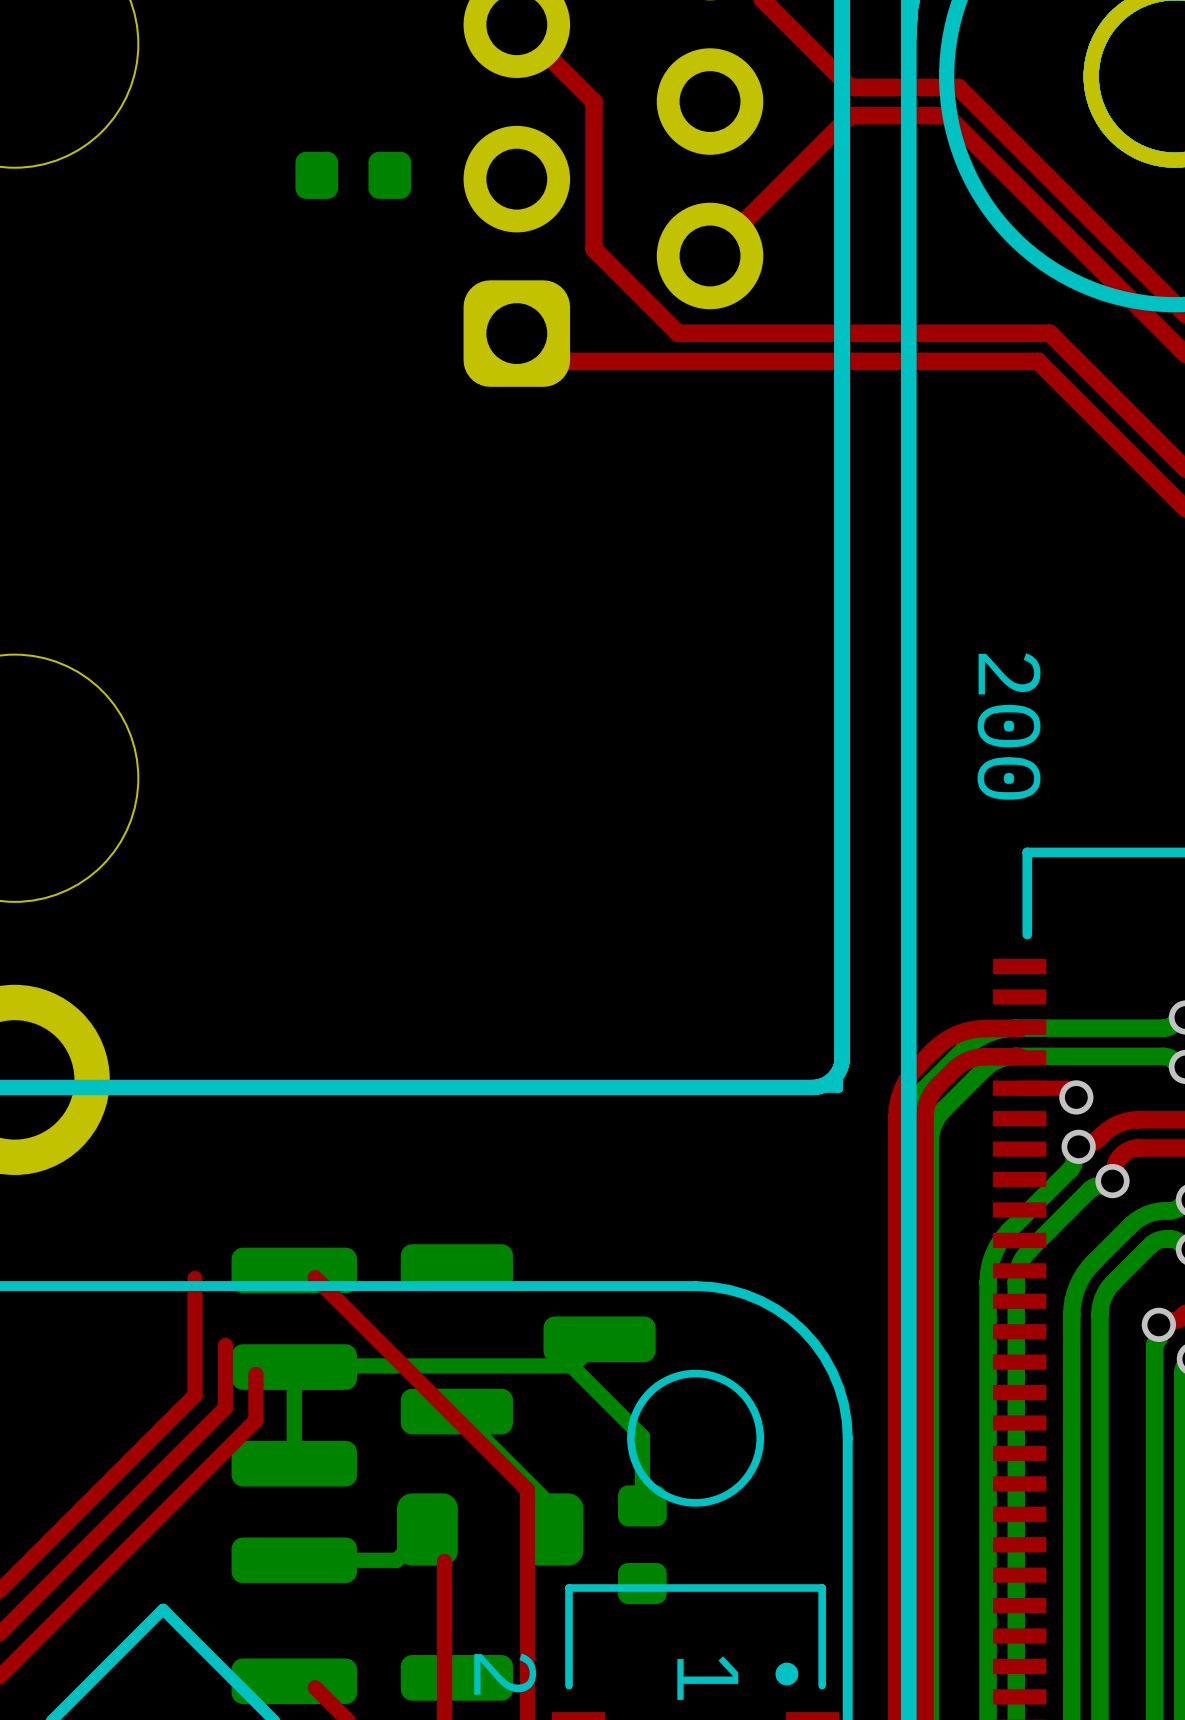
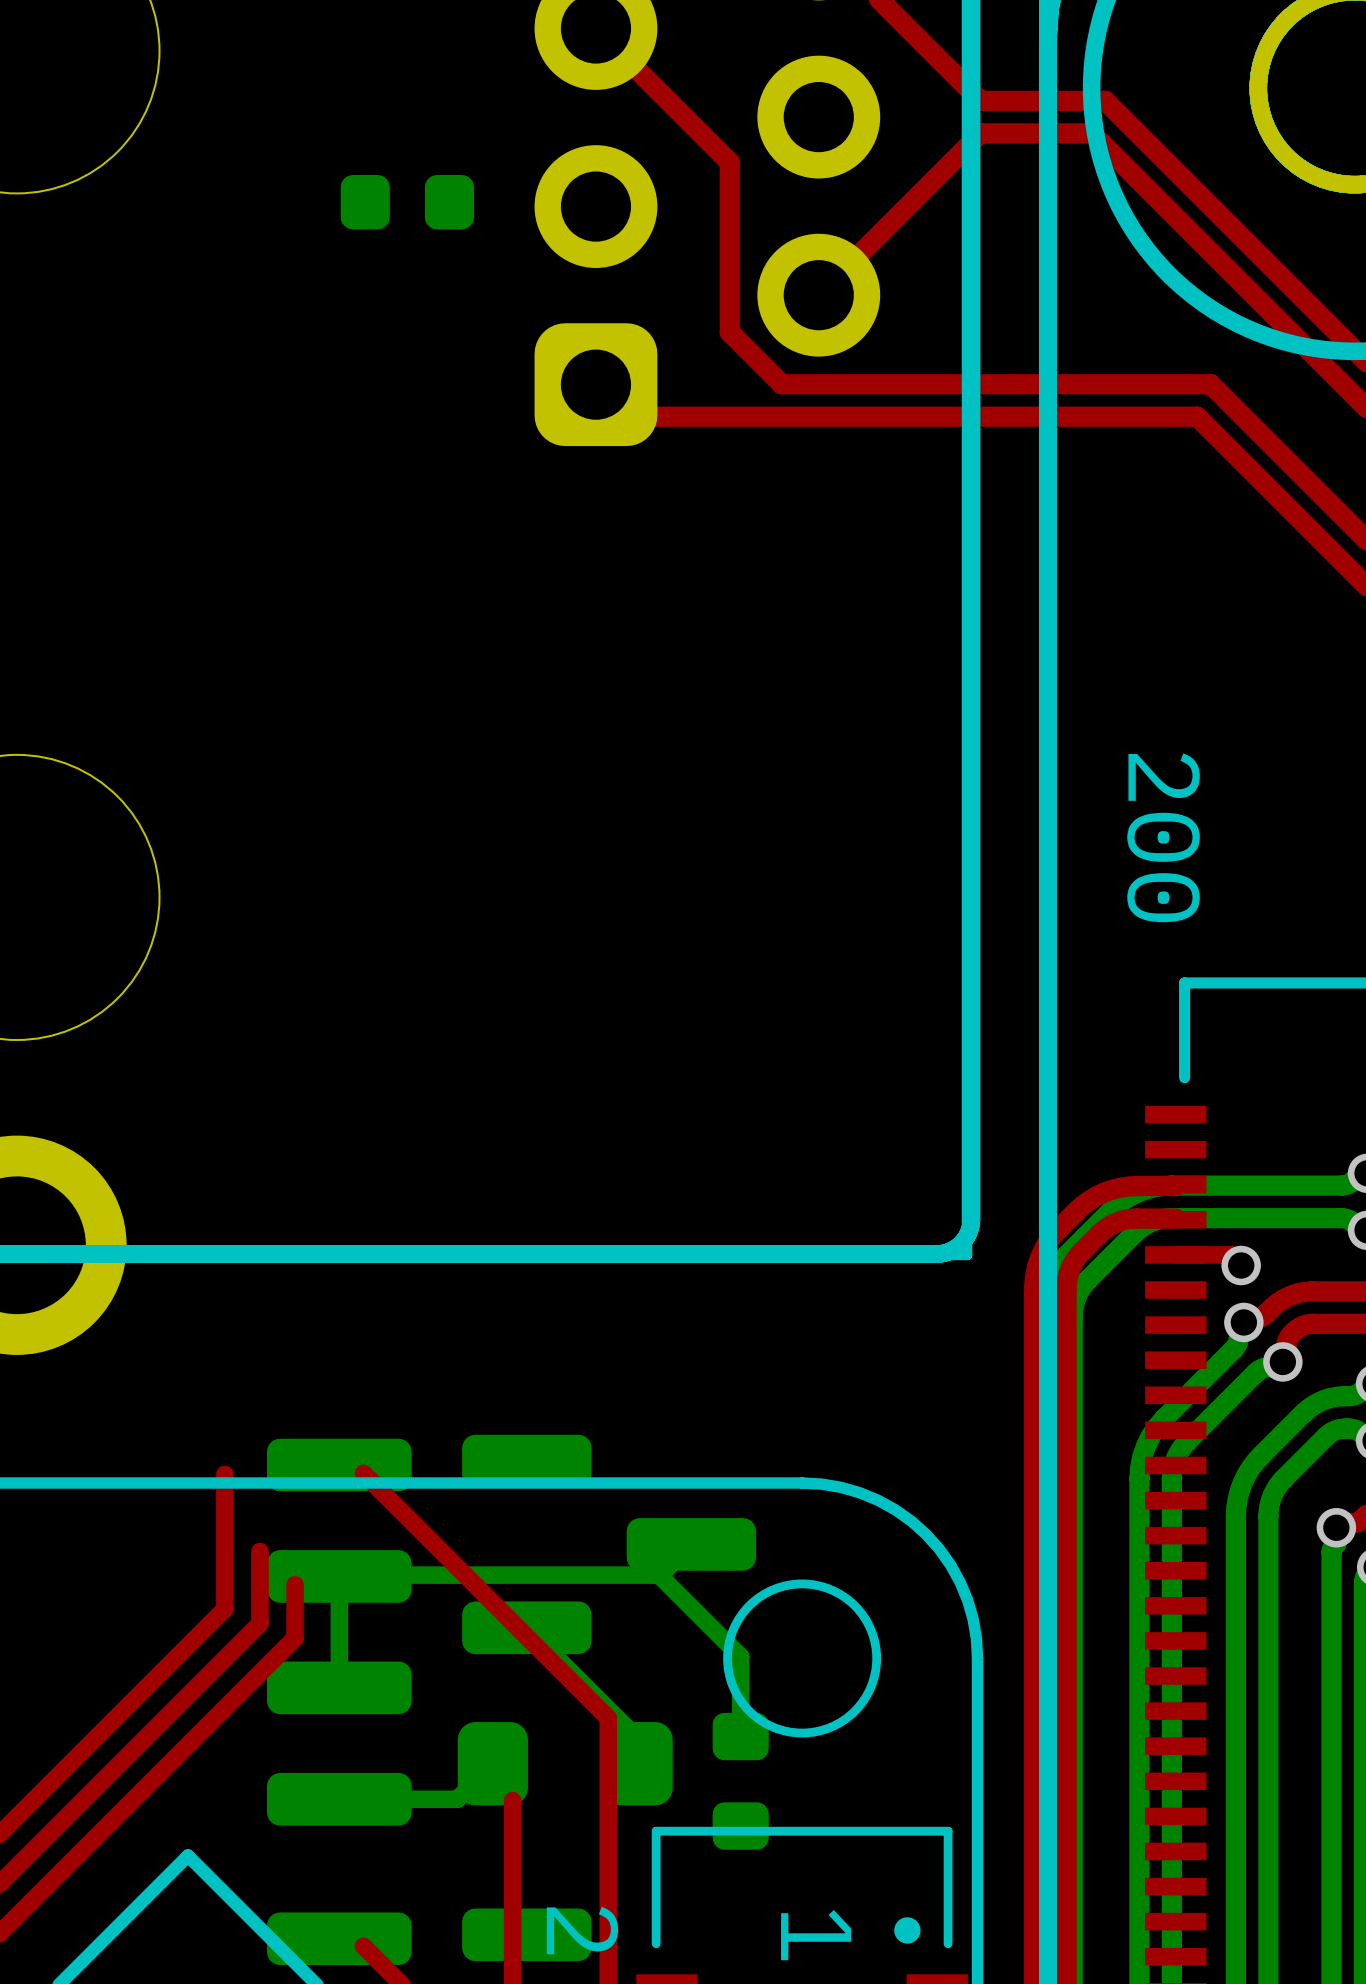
top track: (594, 101) (594, 249) (632, 287) -> (685, 117) (729, 162) (729, 332)

